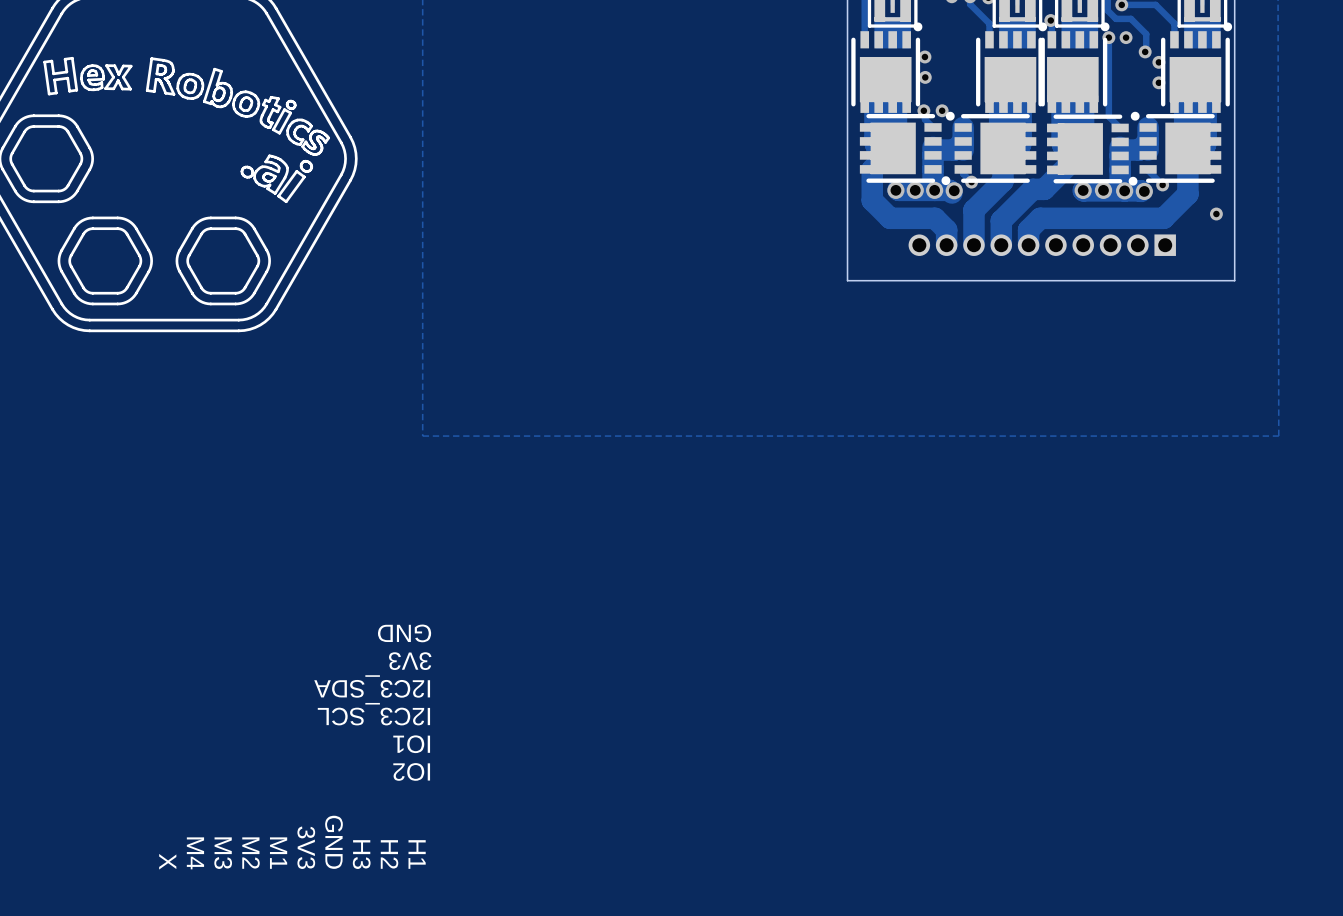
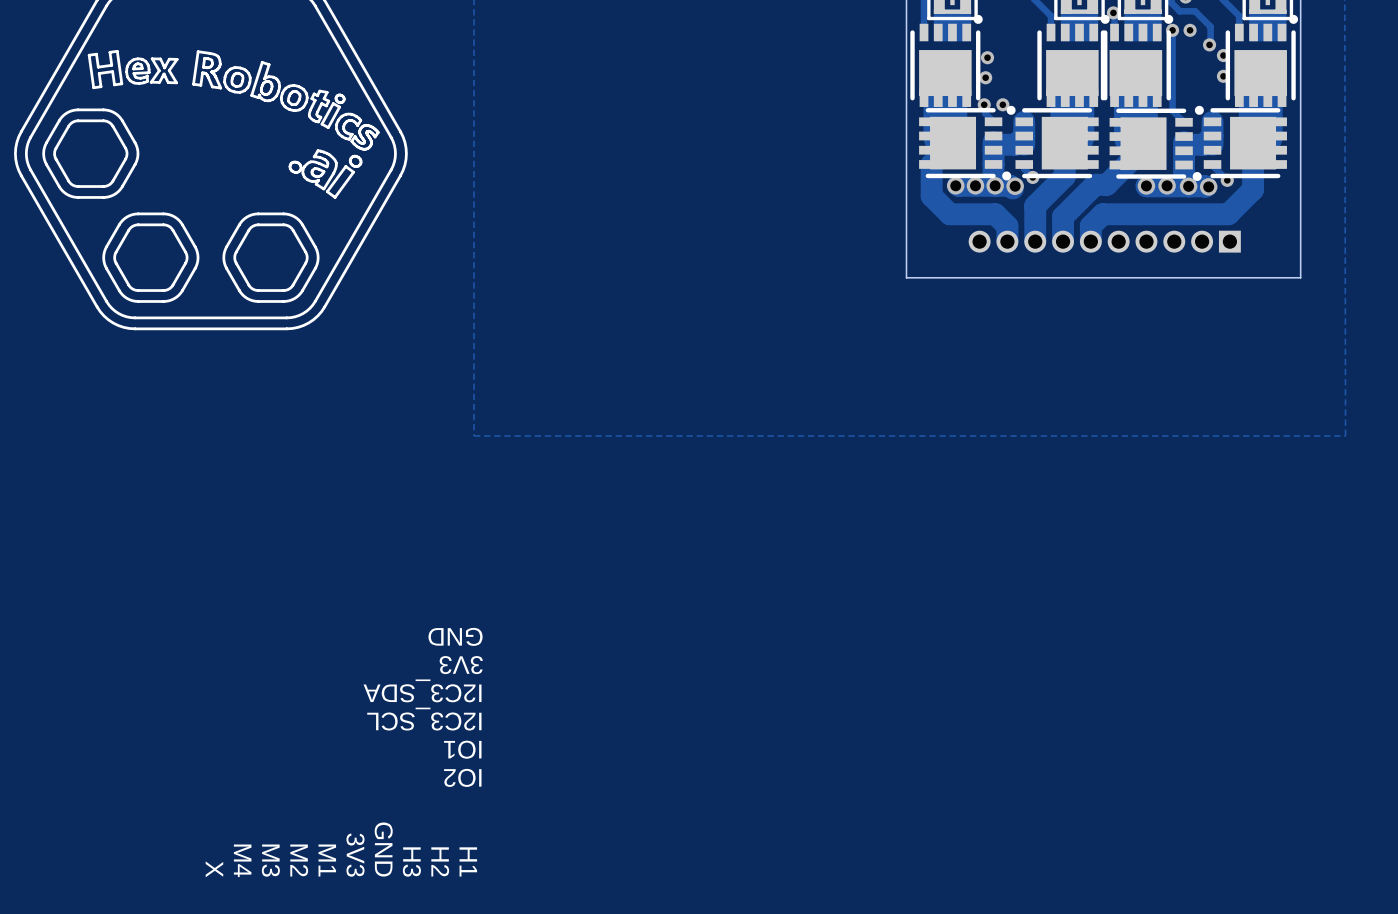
via: (924, 56) -> none
via: none -> (987, 57)
via: (925, 77) -> none
via: none -> (985, 77)
via: (1216, 214) -> none

